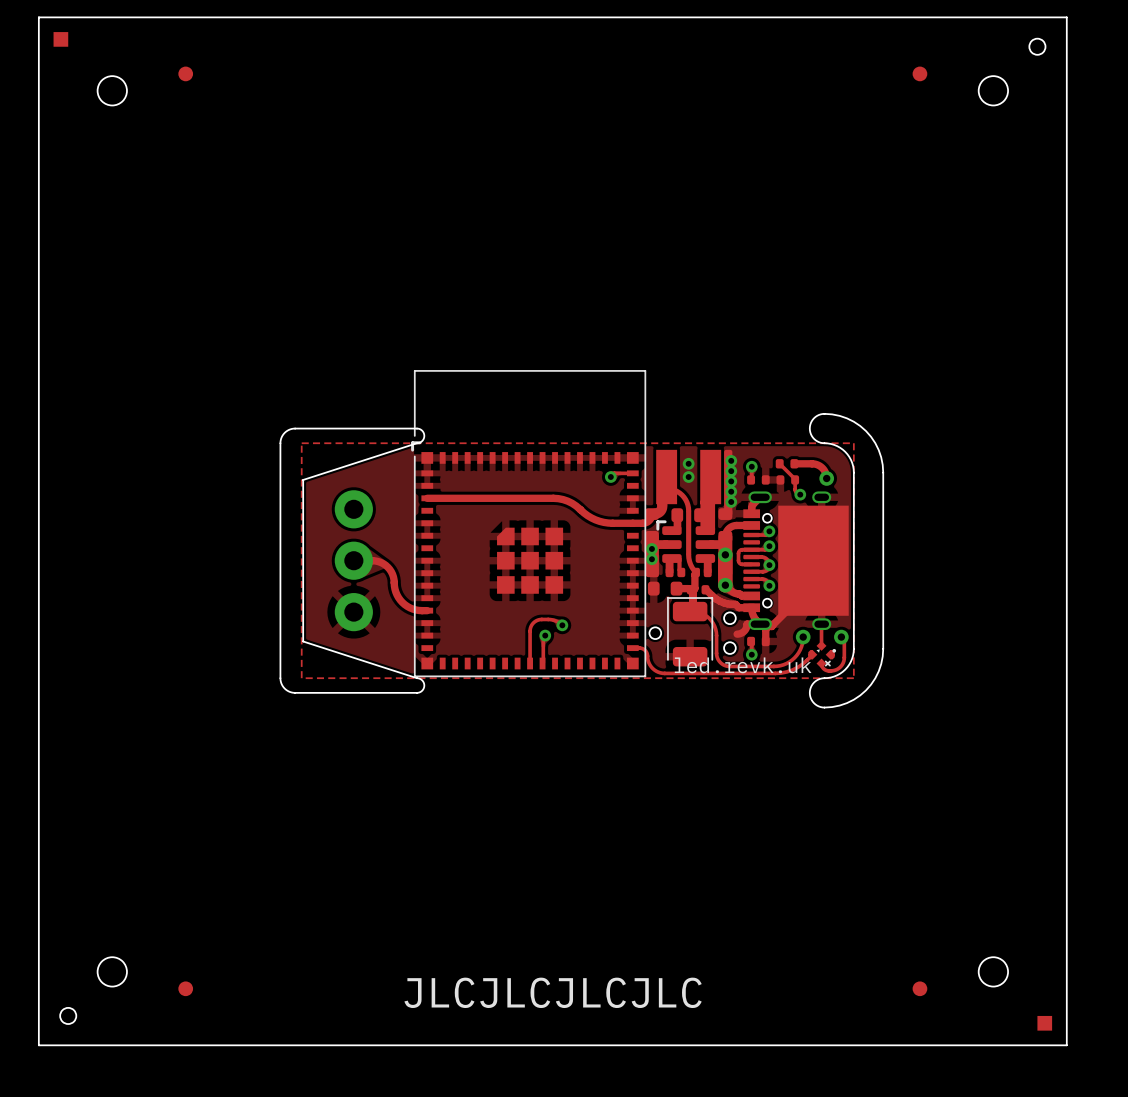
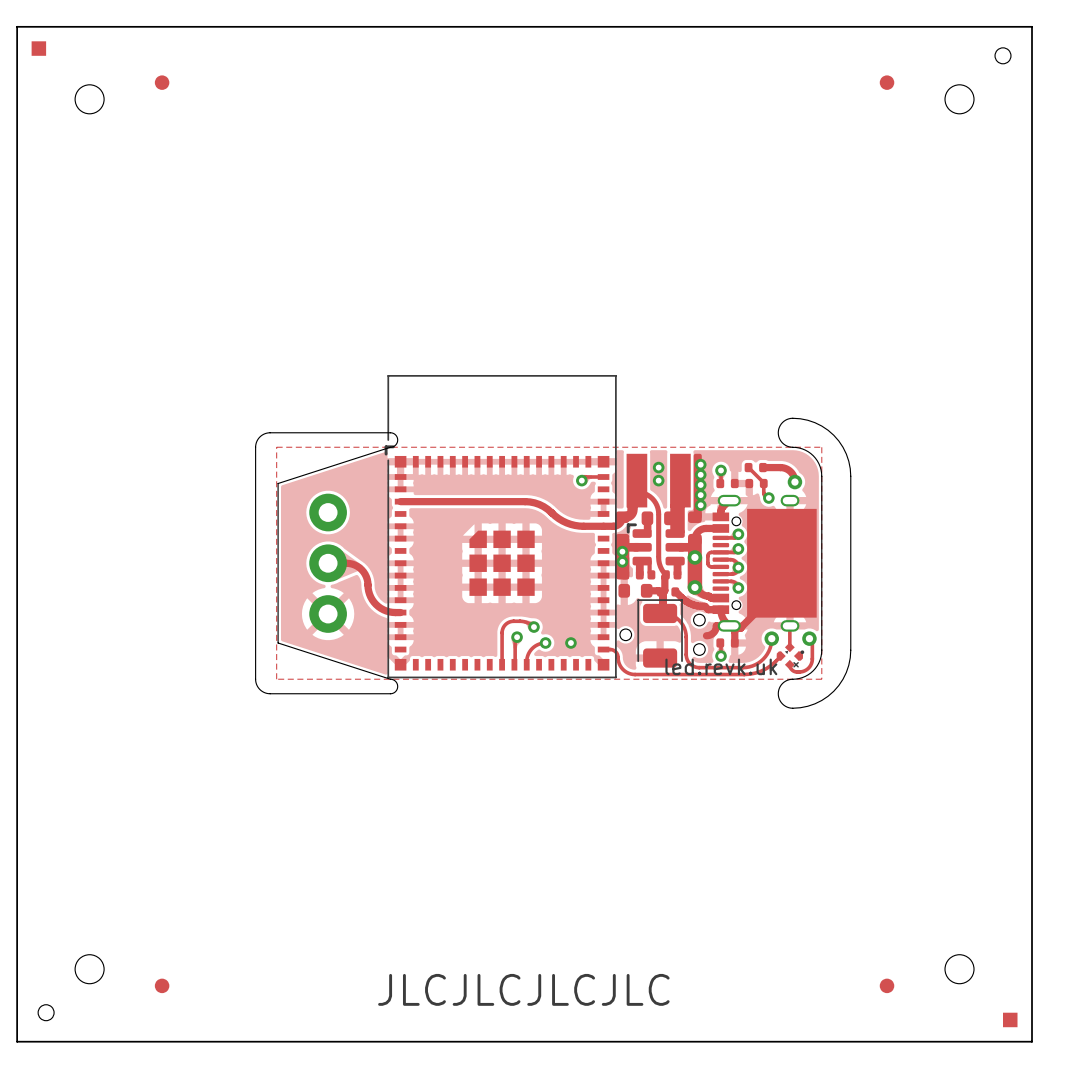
track: none -> (545, 643) (537, 644) (530, 650) (526, 664)
via: none -> (545, 643)
via: none -> (570, 643)

